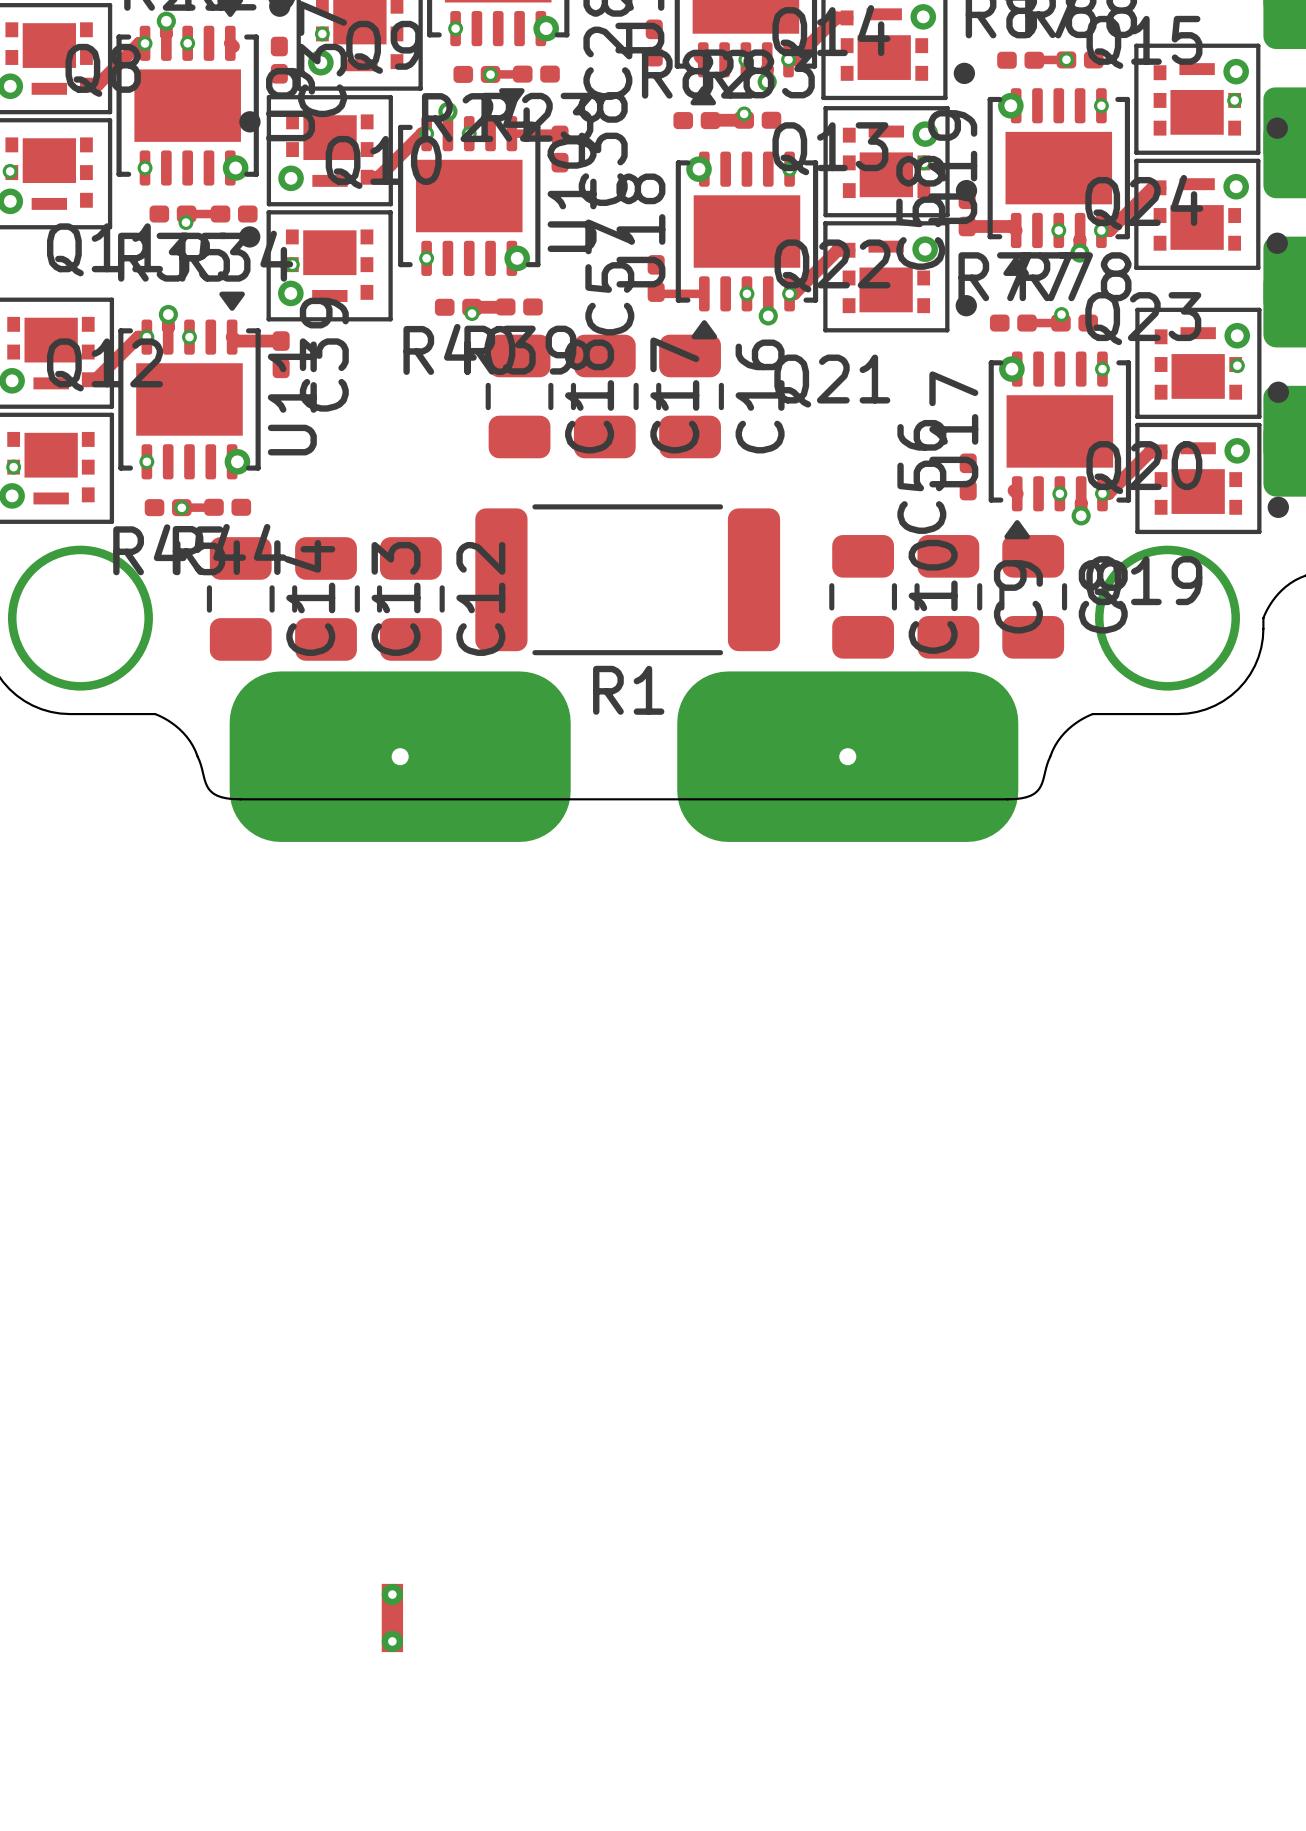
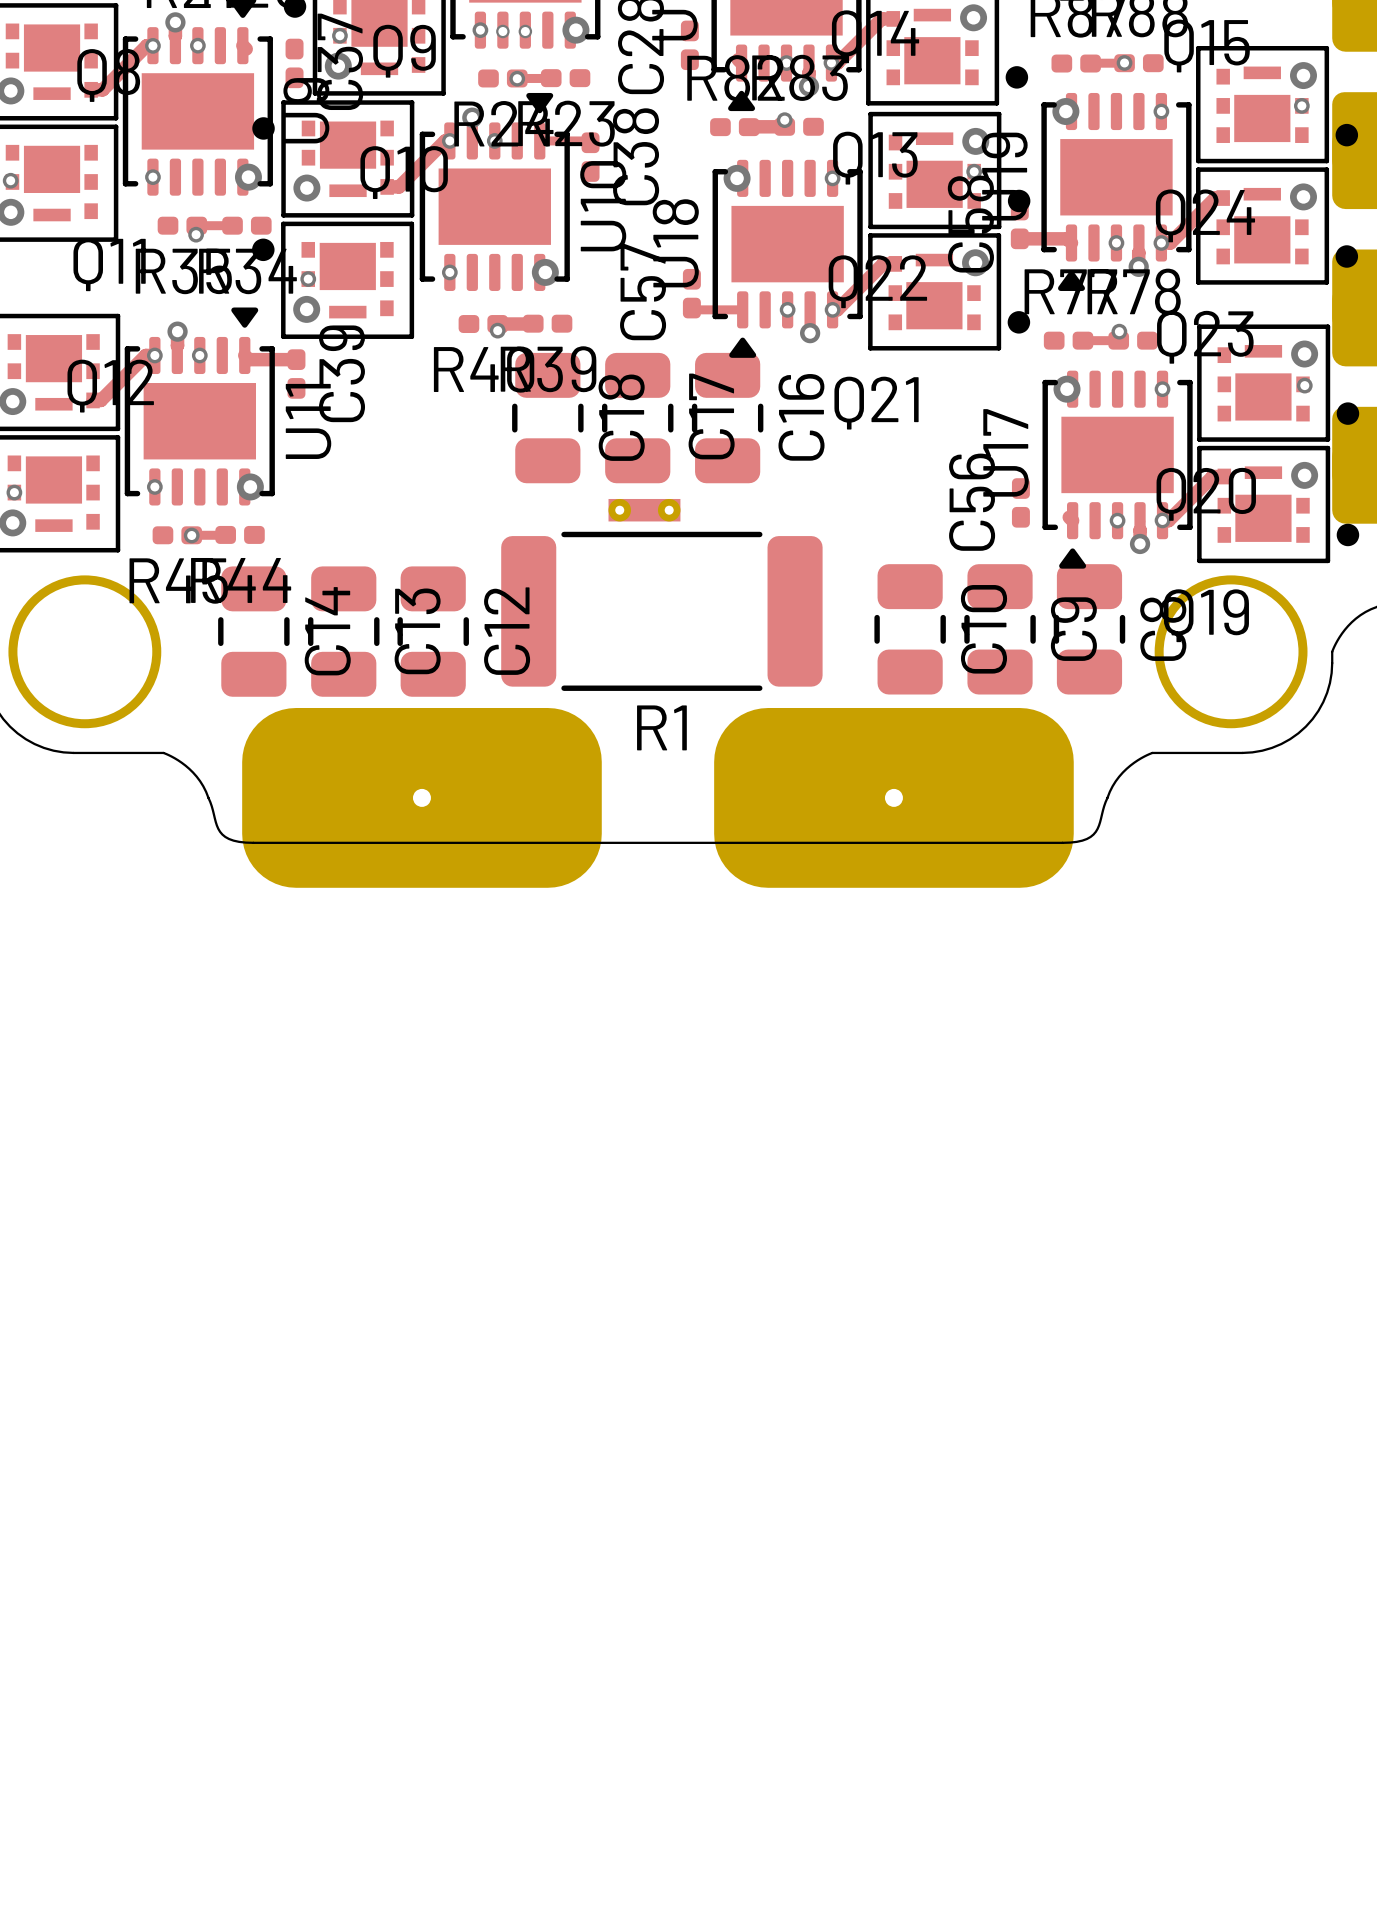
via: none -> (502, 31)
via: none -> (525, 31)
part: none -> (644, 510)
part: (392, 1617) -> none

